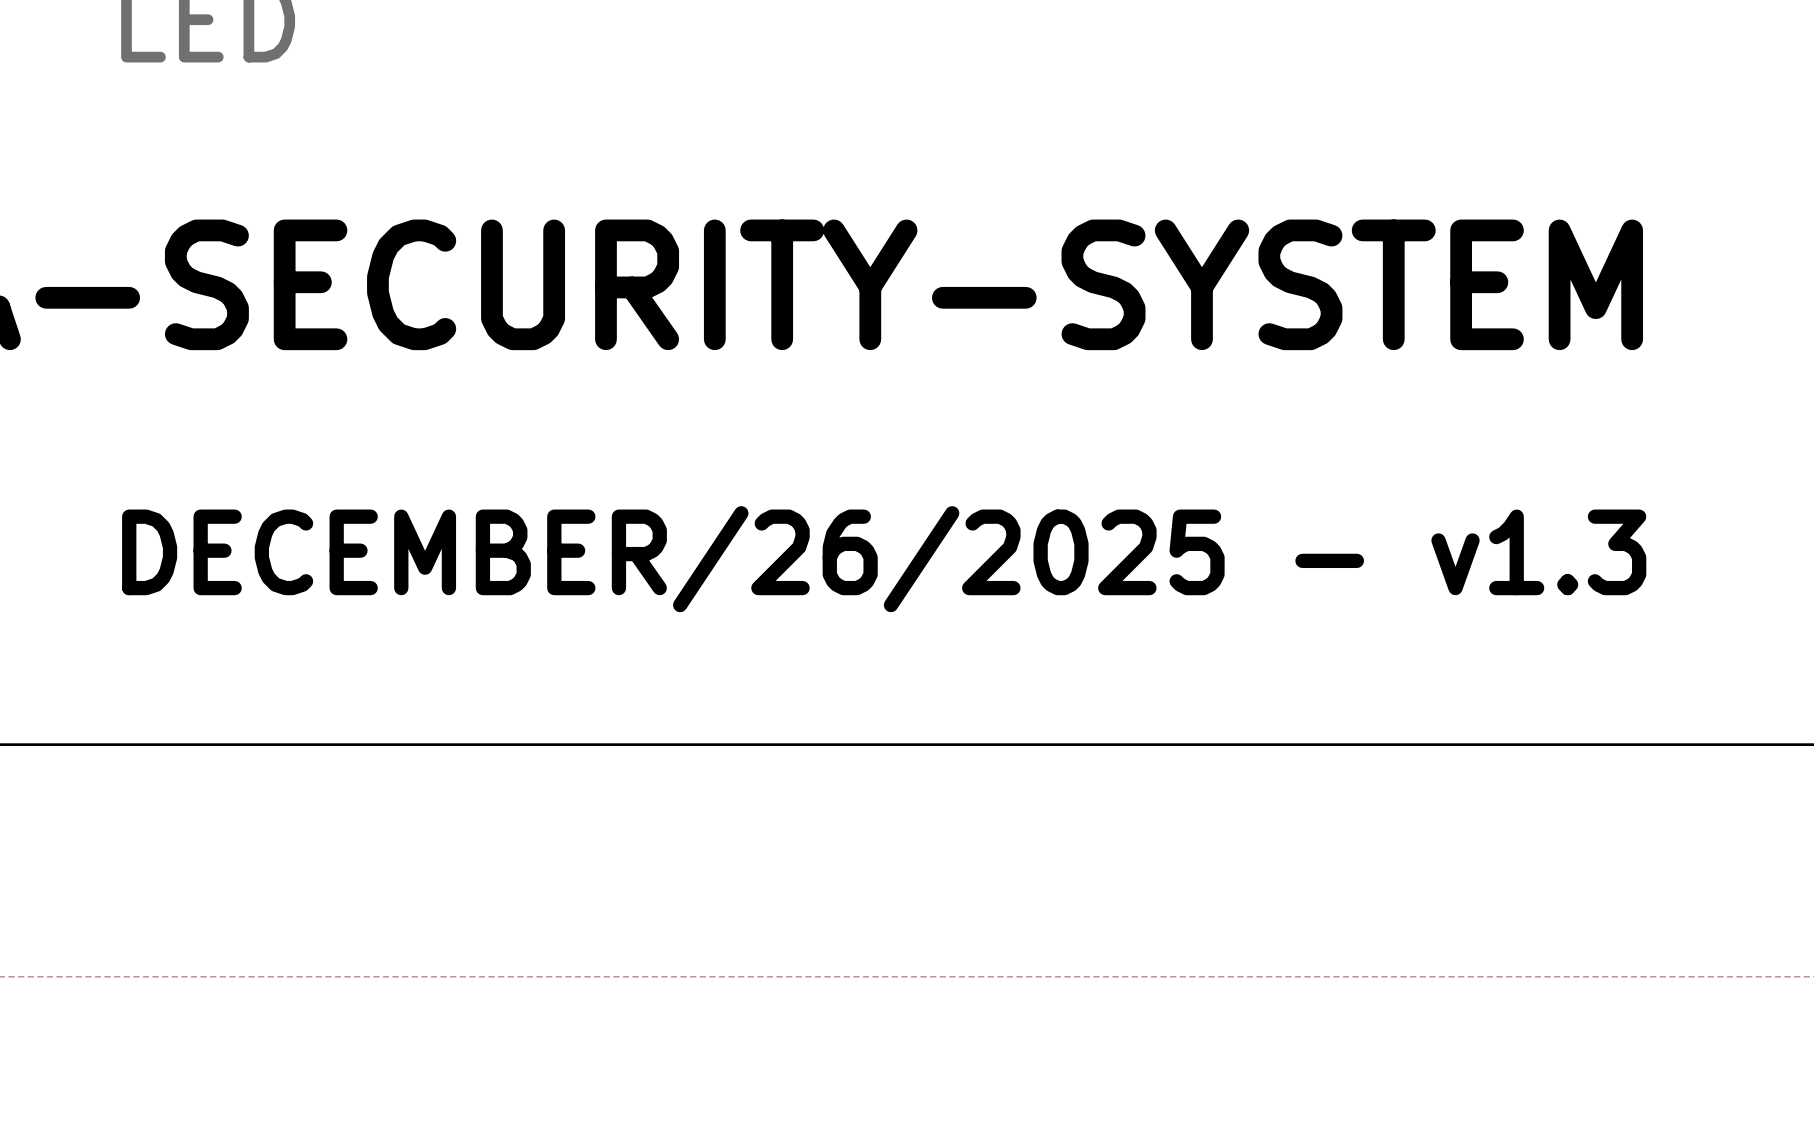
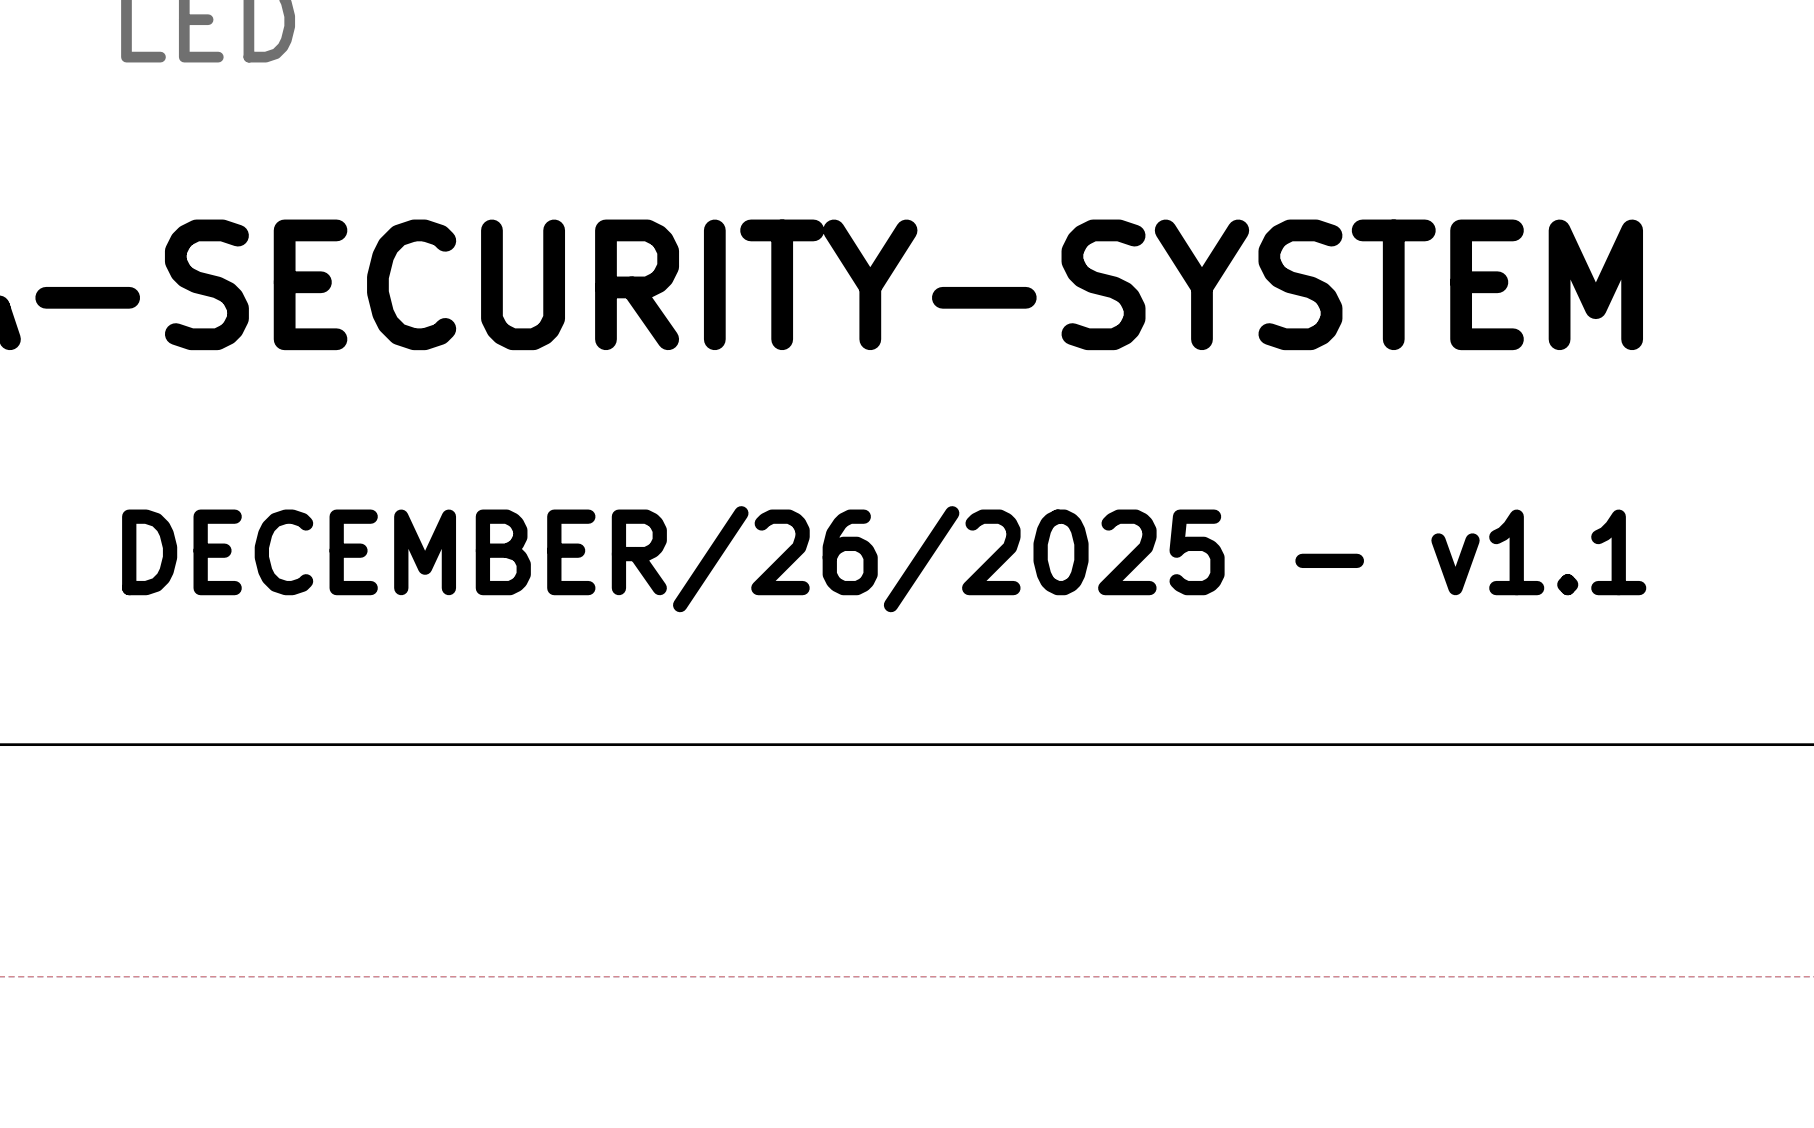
text: DECEMBER/26/2025 - v1.3 (884, 559) -> DECEMBER/26/2025 - v1.1 (884, 559)

